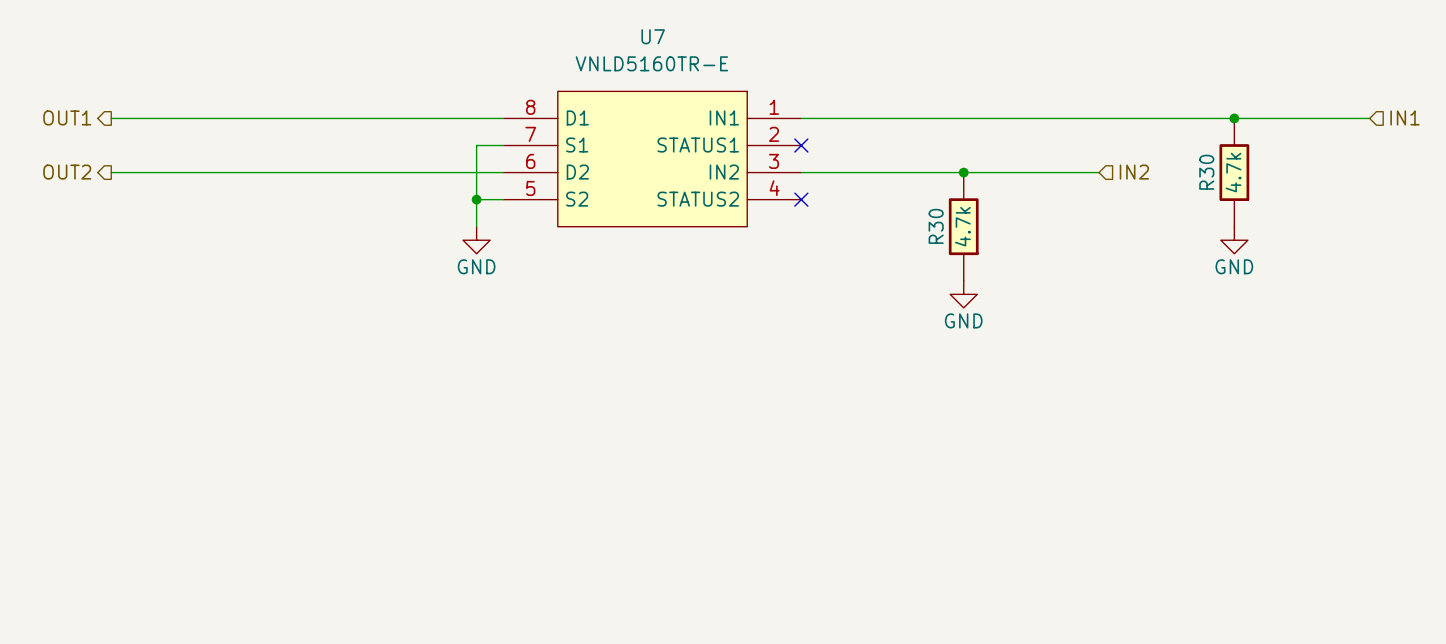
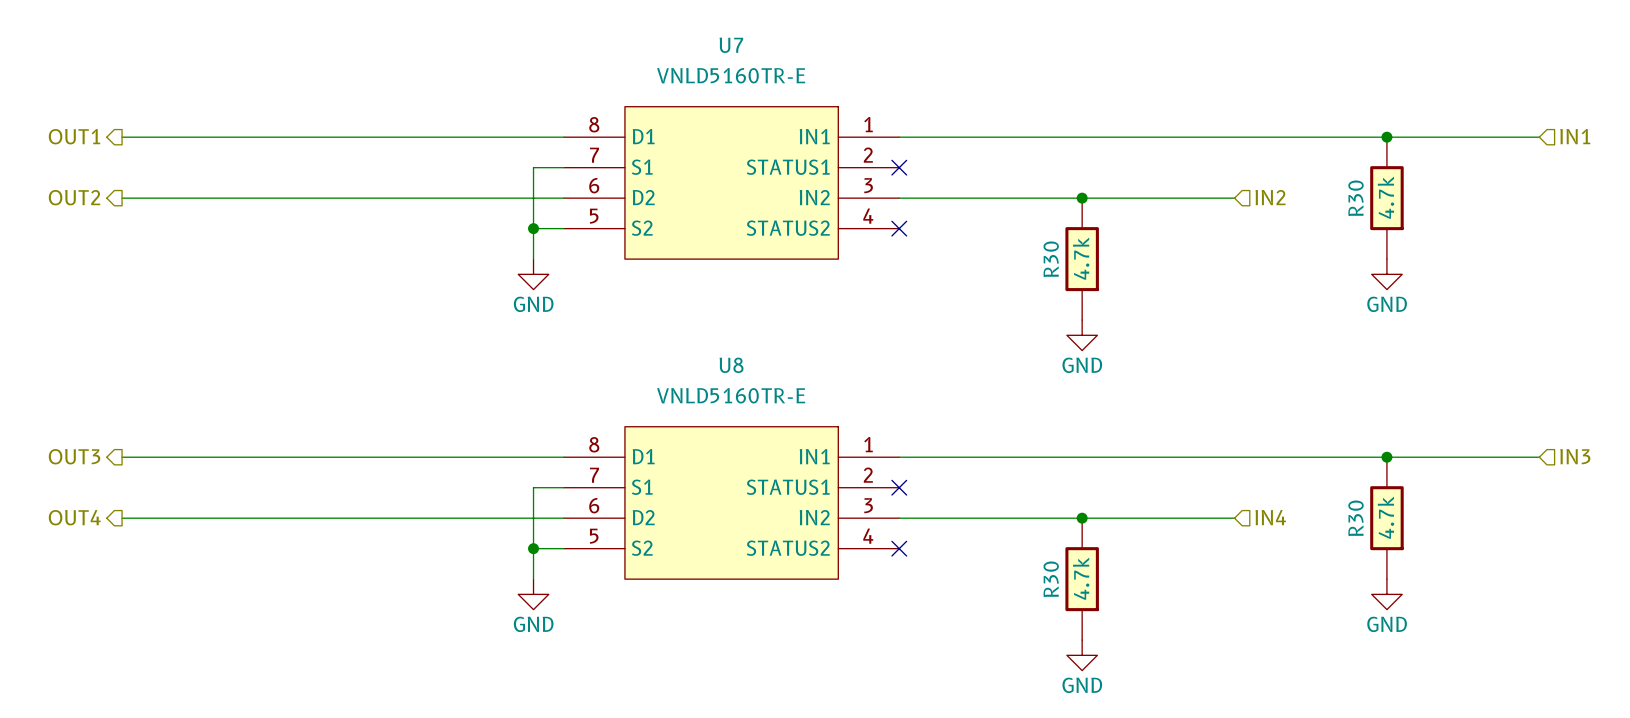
hierarchical label: none -> OUT3 (74, 456)
wire: none -> (122, 457) (563, 457)
wire: none -> (899, 457) (1539, 457)
junction: none -> (1386, 457)
hierarchical label: none -> IN3 (1575, 456)
wire: none -> (563, 487) (533, 487) (533, 579)
no-connect mark: none -> (899, 487)
U8: none -> VNLD5160TR-E (731, 502)
hierarchical label: none -> OUT4 (74, 517)
hierarchical label: none -> IN4 (1270, 517)
wire: none -> (122, 518) (563, 518)
wire: none -> (899, 518) (1234, 518)
junction: none -> (1082, 518)
R30: none -> 4.7k (1386, 518)
wire: none -> (533, 548) (563, 548)
junction: none -> (533, 548)
no-connect mark: none -> (899, 548)
R30: none -> 4.7k (1082, 579)
power symbol: none -> GND (533, 594)
power symbol: none -> GND (1386, 594)
power symbol: none -> GND (1082, 655)

